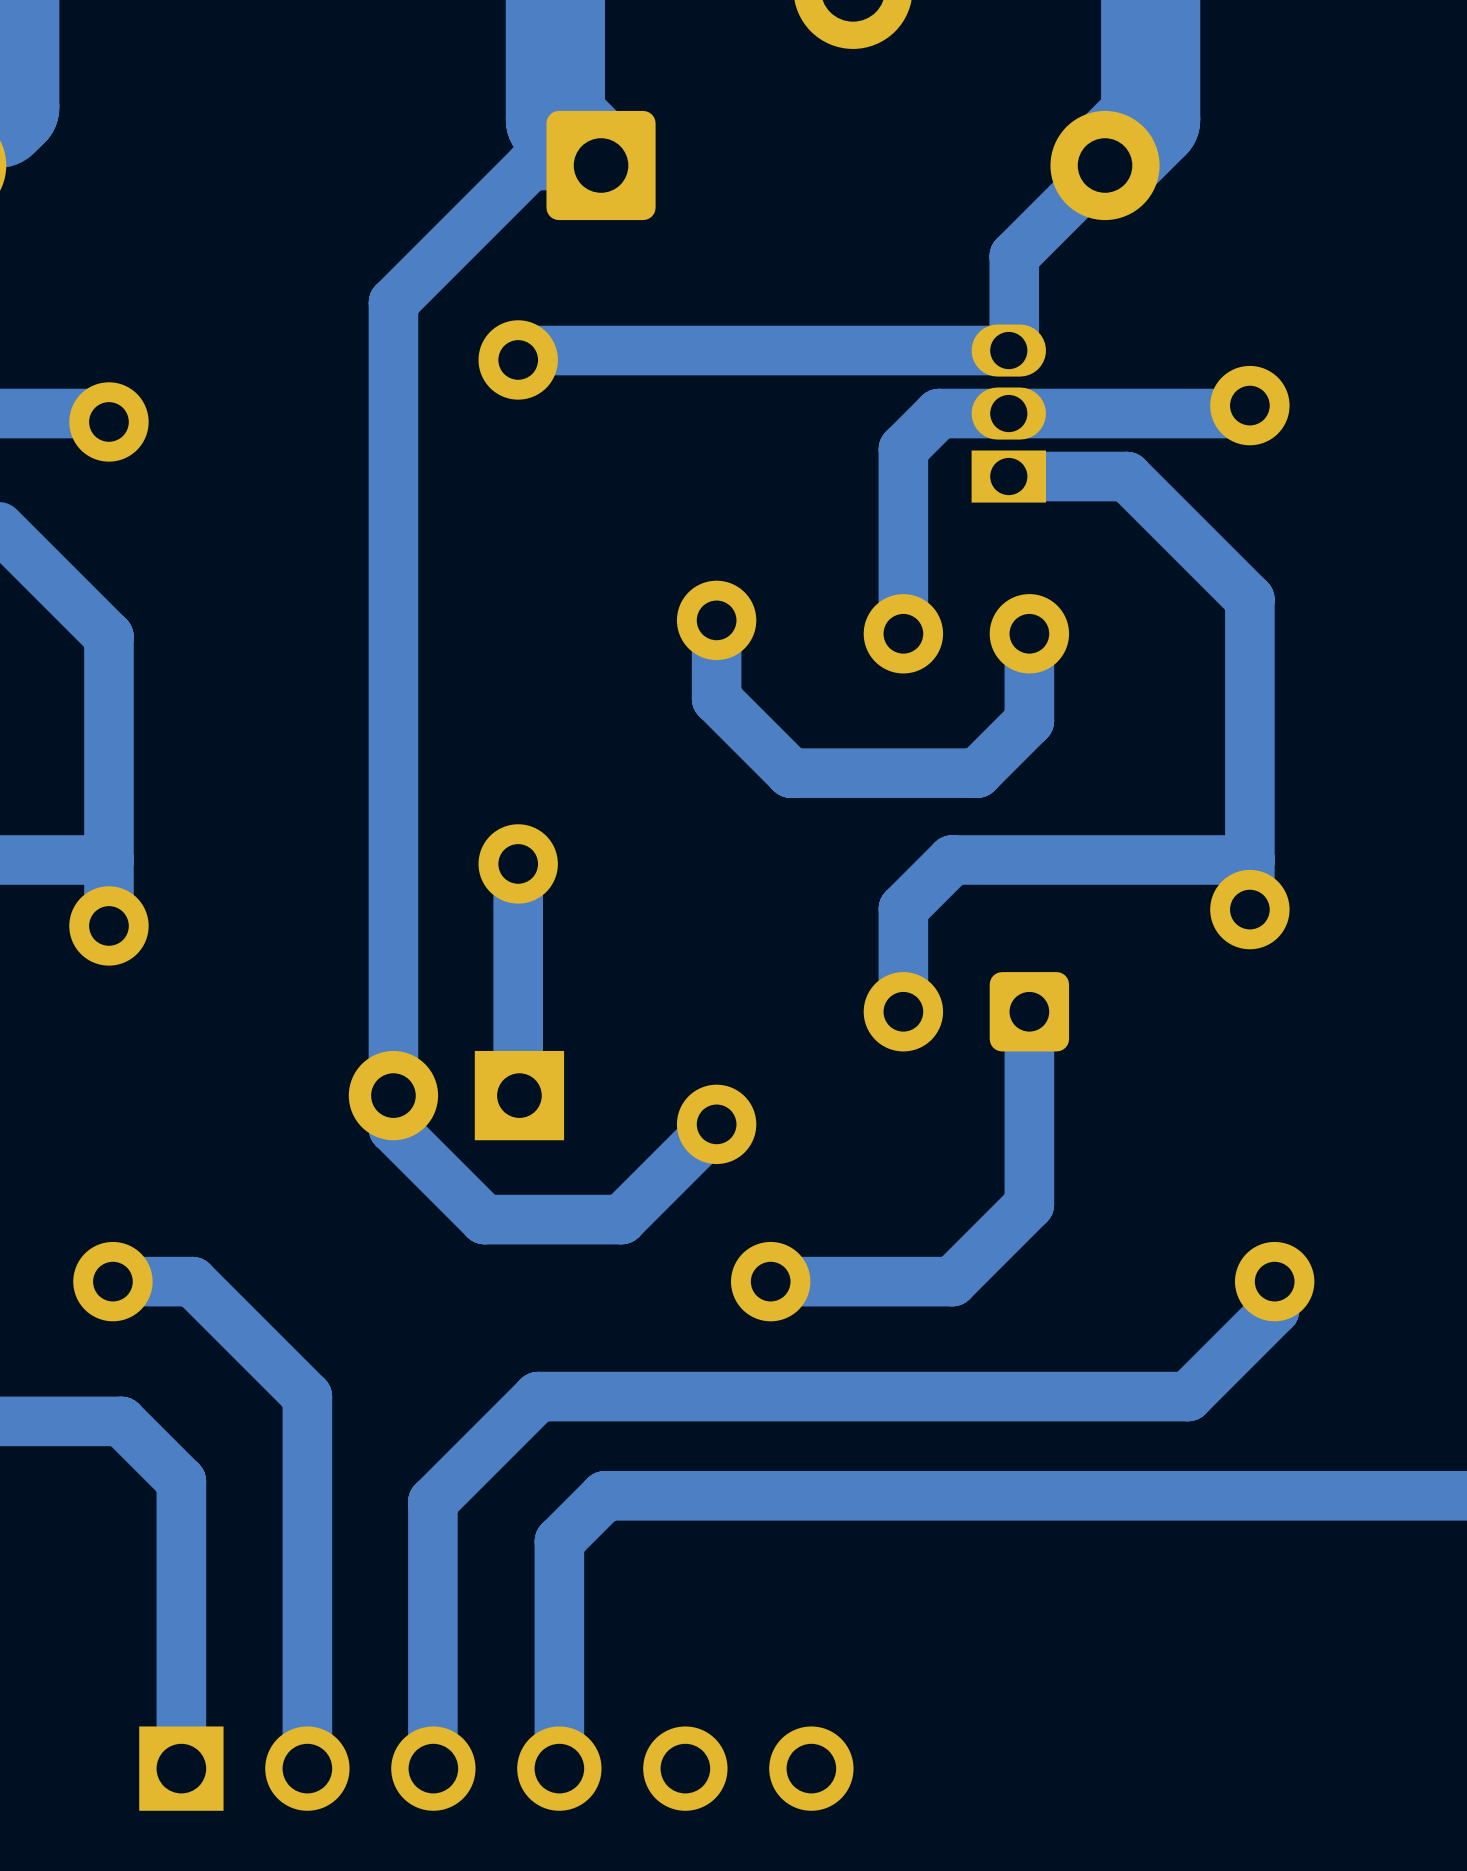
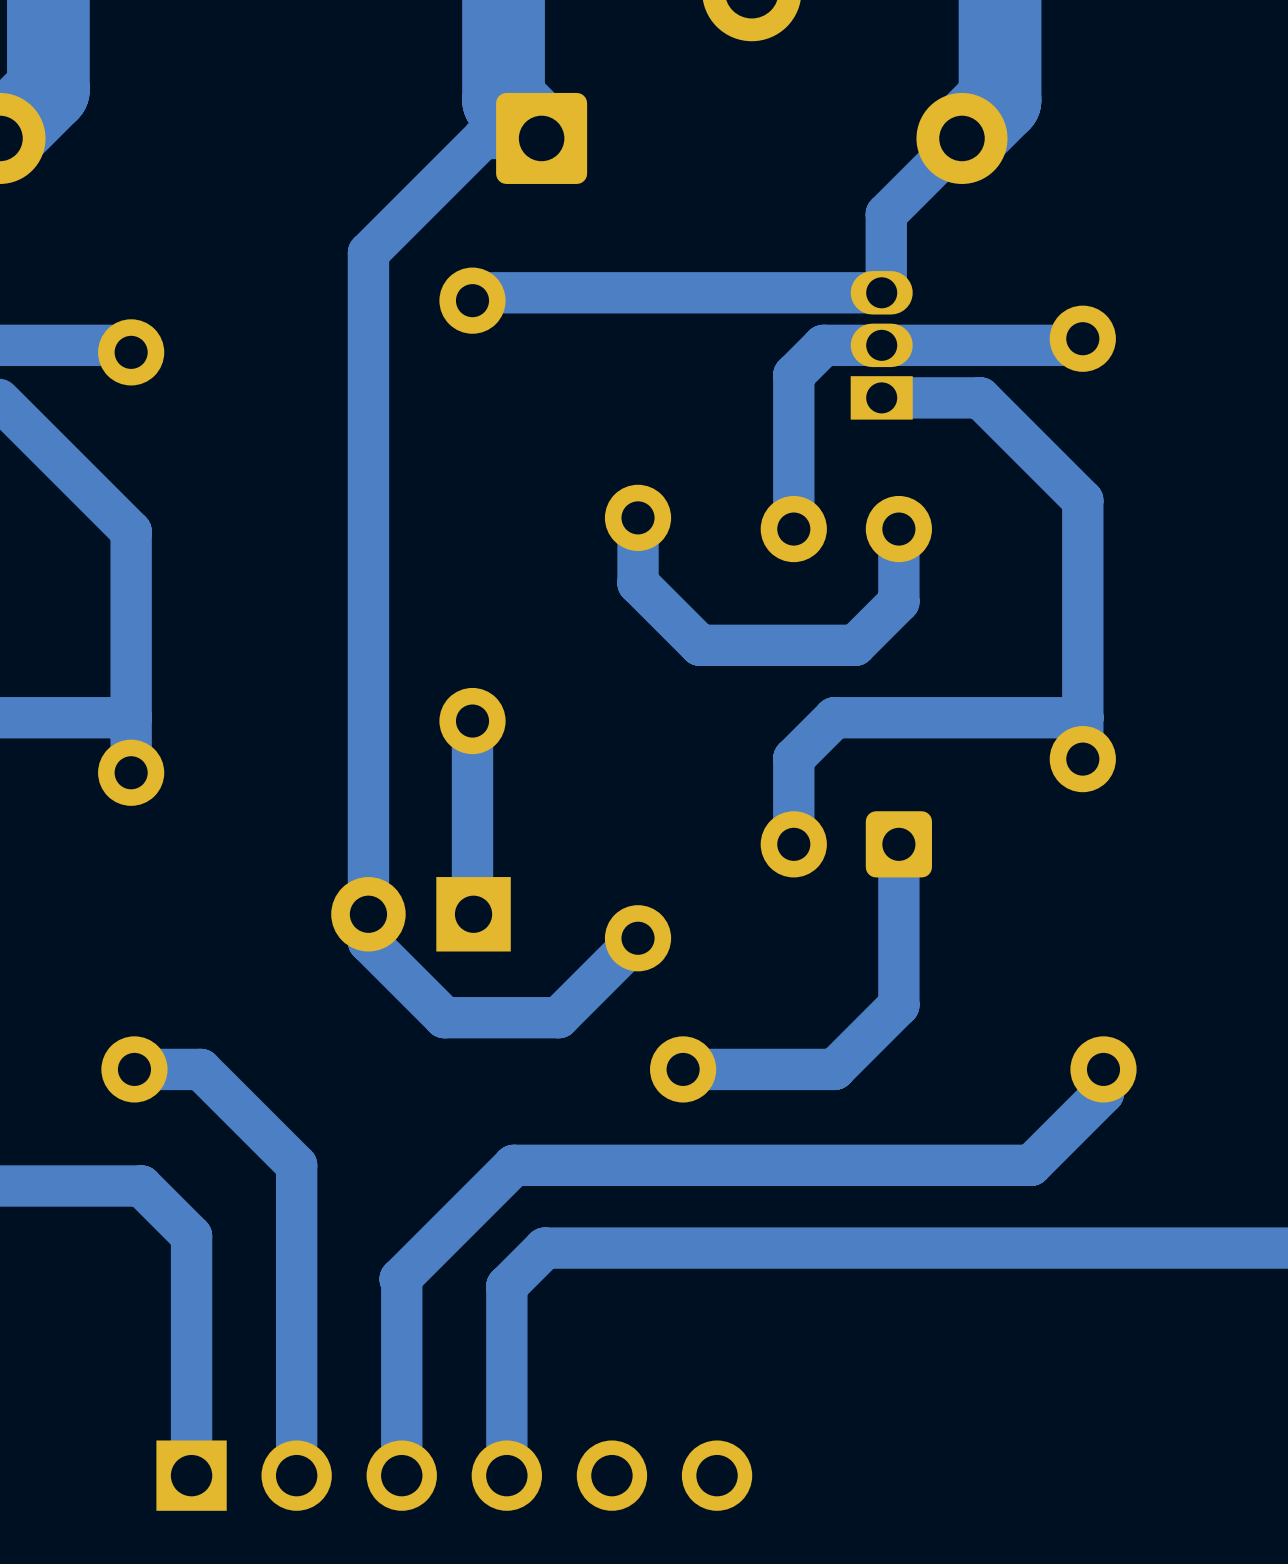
track: (567, 1396) (538, 1396) (432, 1501) (432, 1768) -> (513, 1165) (400, 1279) (401, 1280) (401, 1475)

